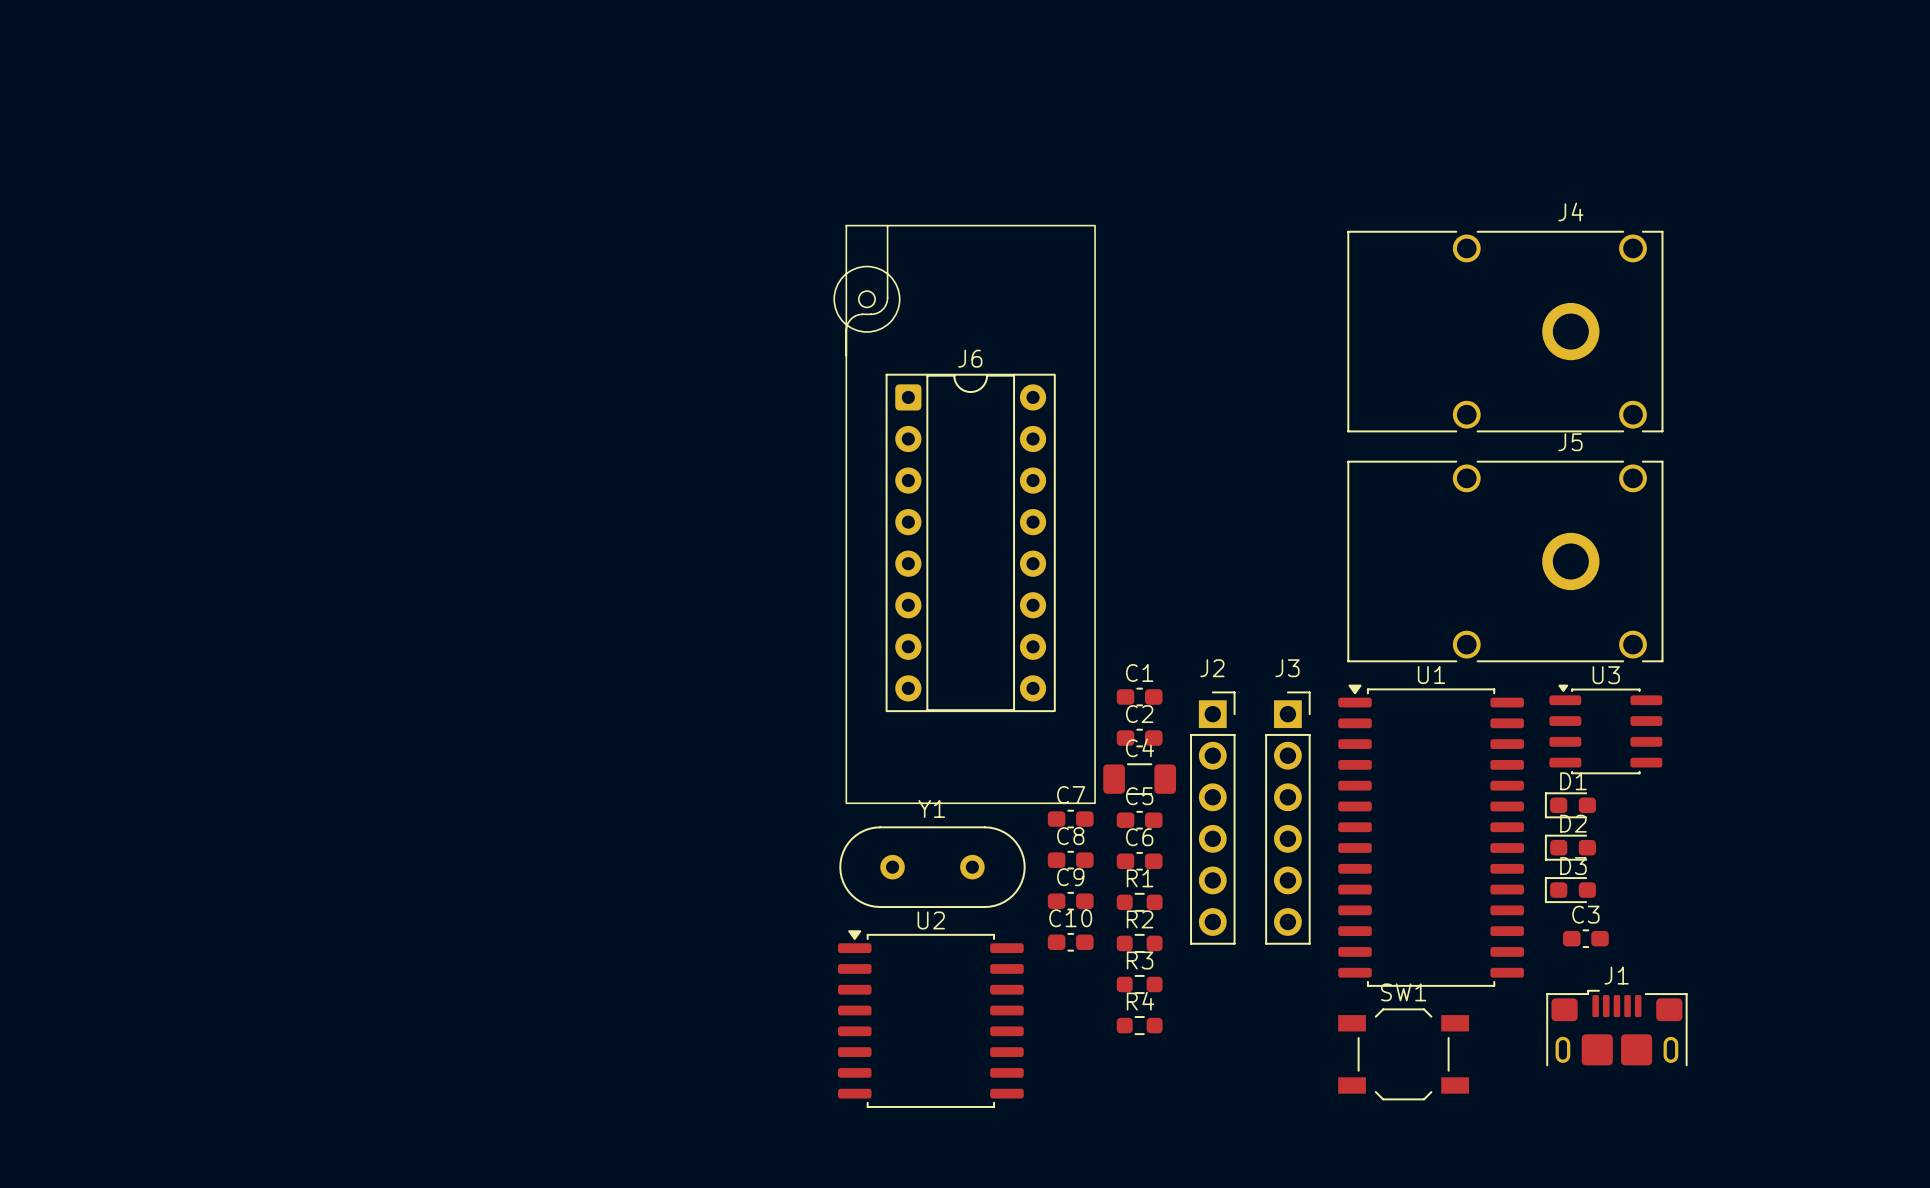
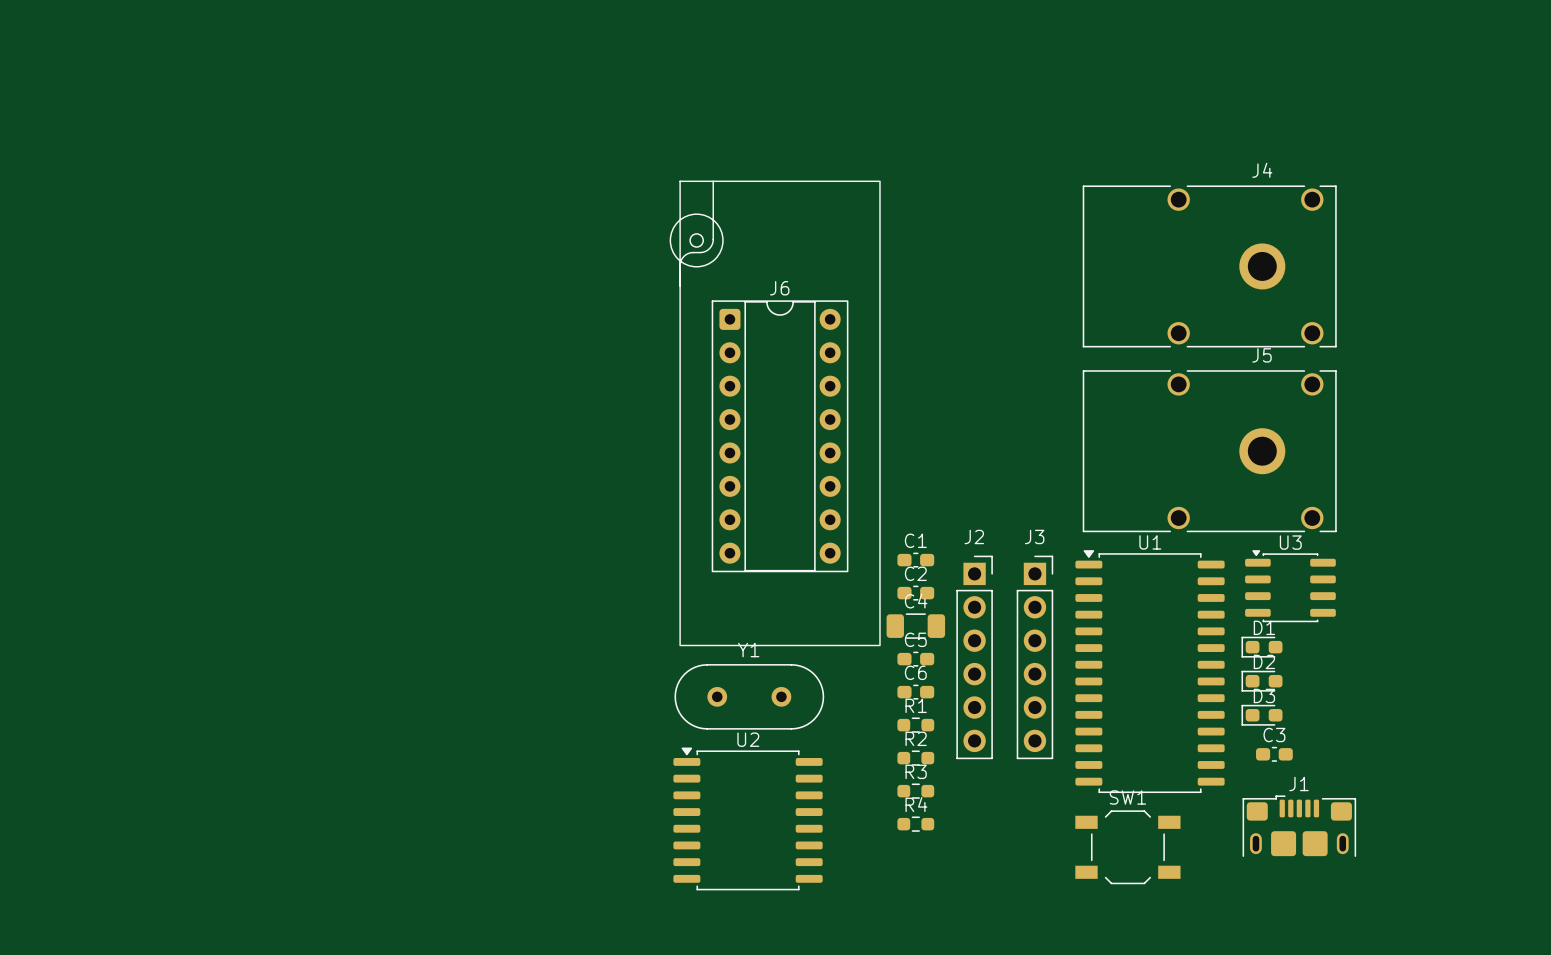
C7: (1070, 819) -> none
C8: (1070, 860) -> none
C9: (1070, 901) -> none
C10: (1070, 942) -> none

